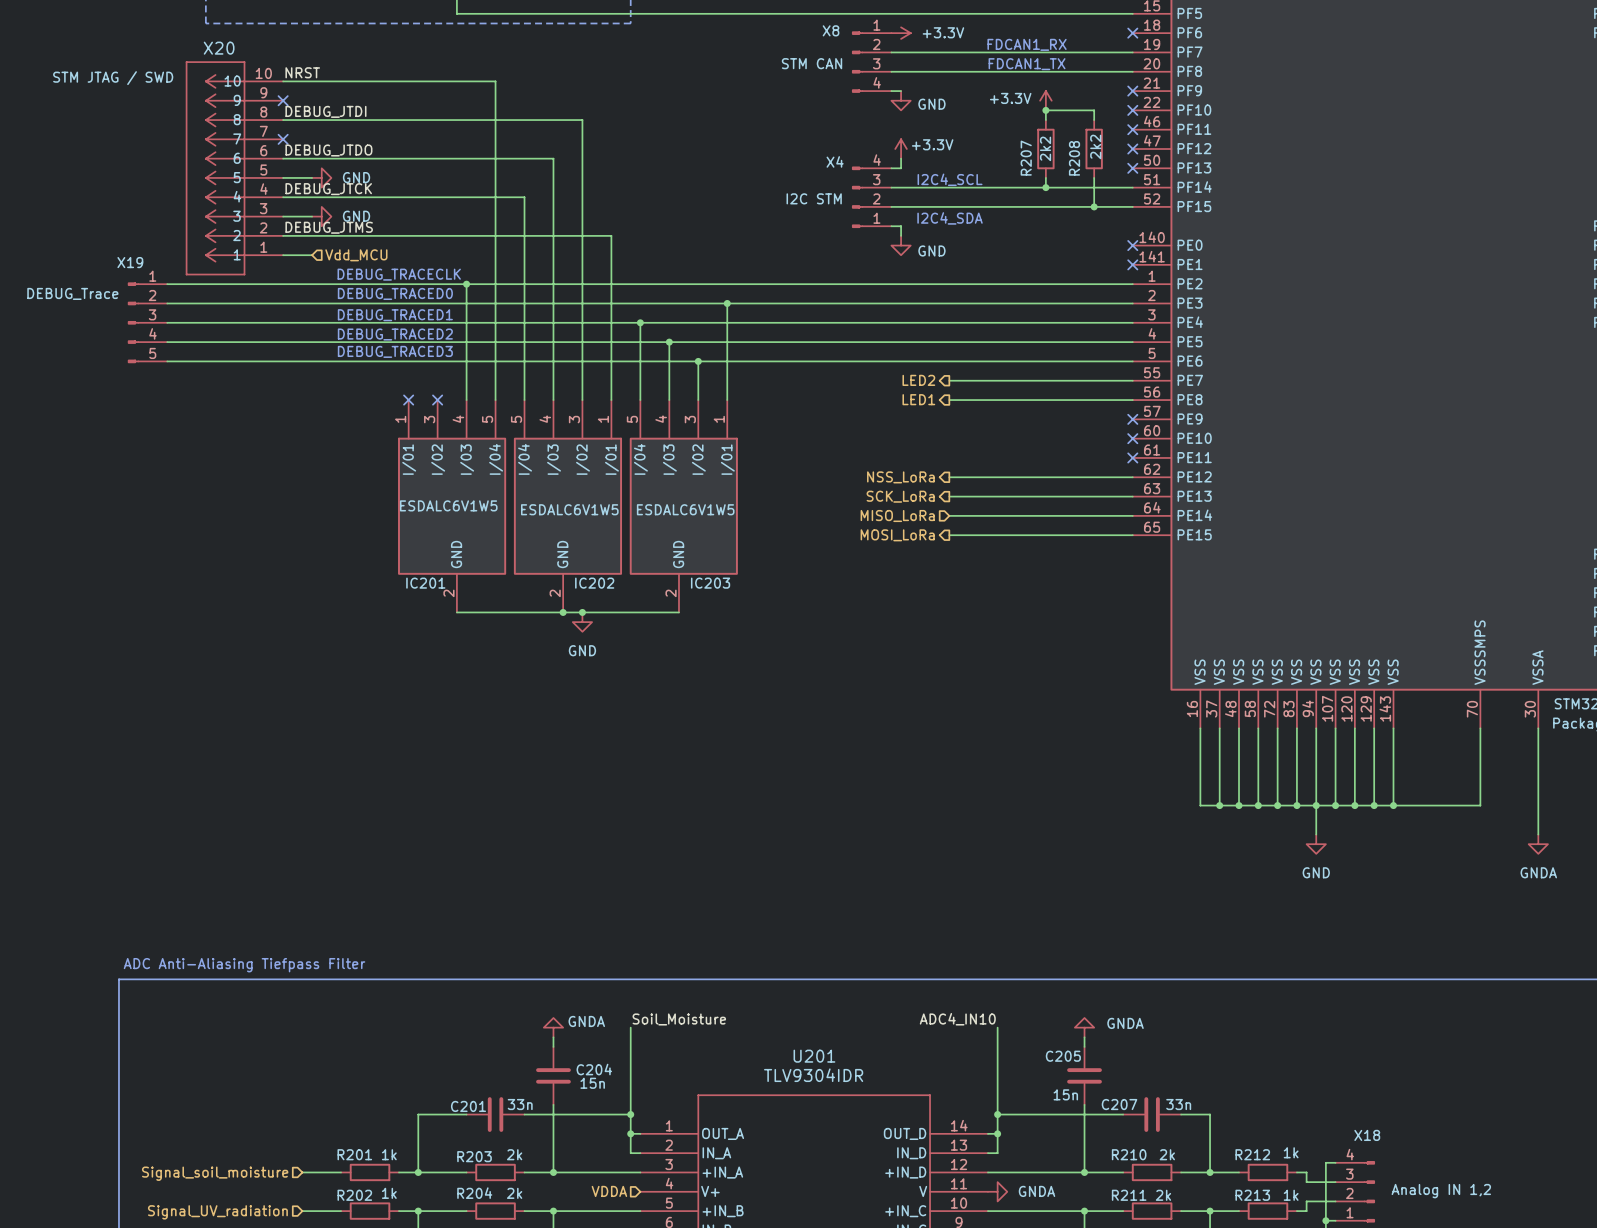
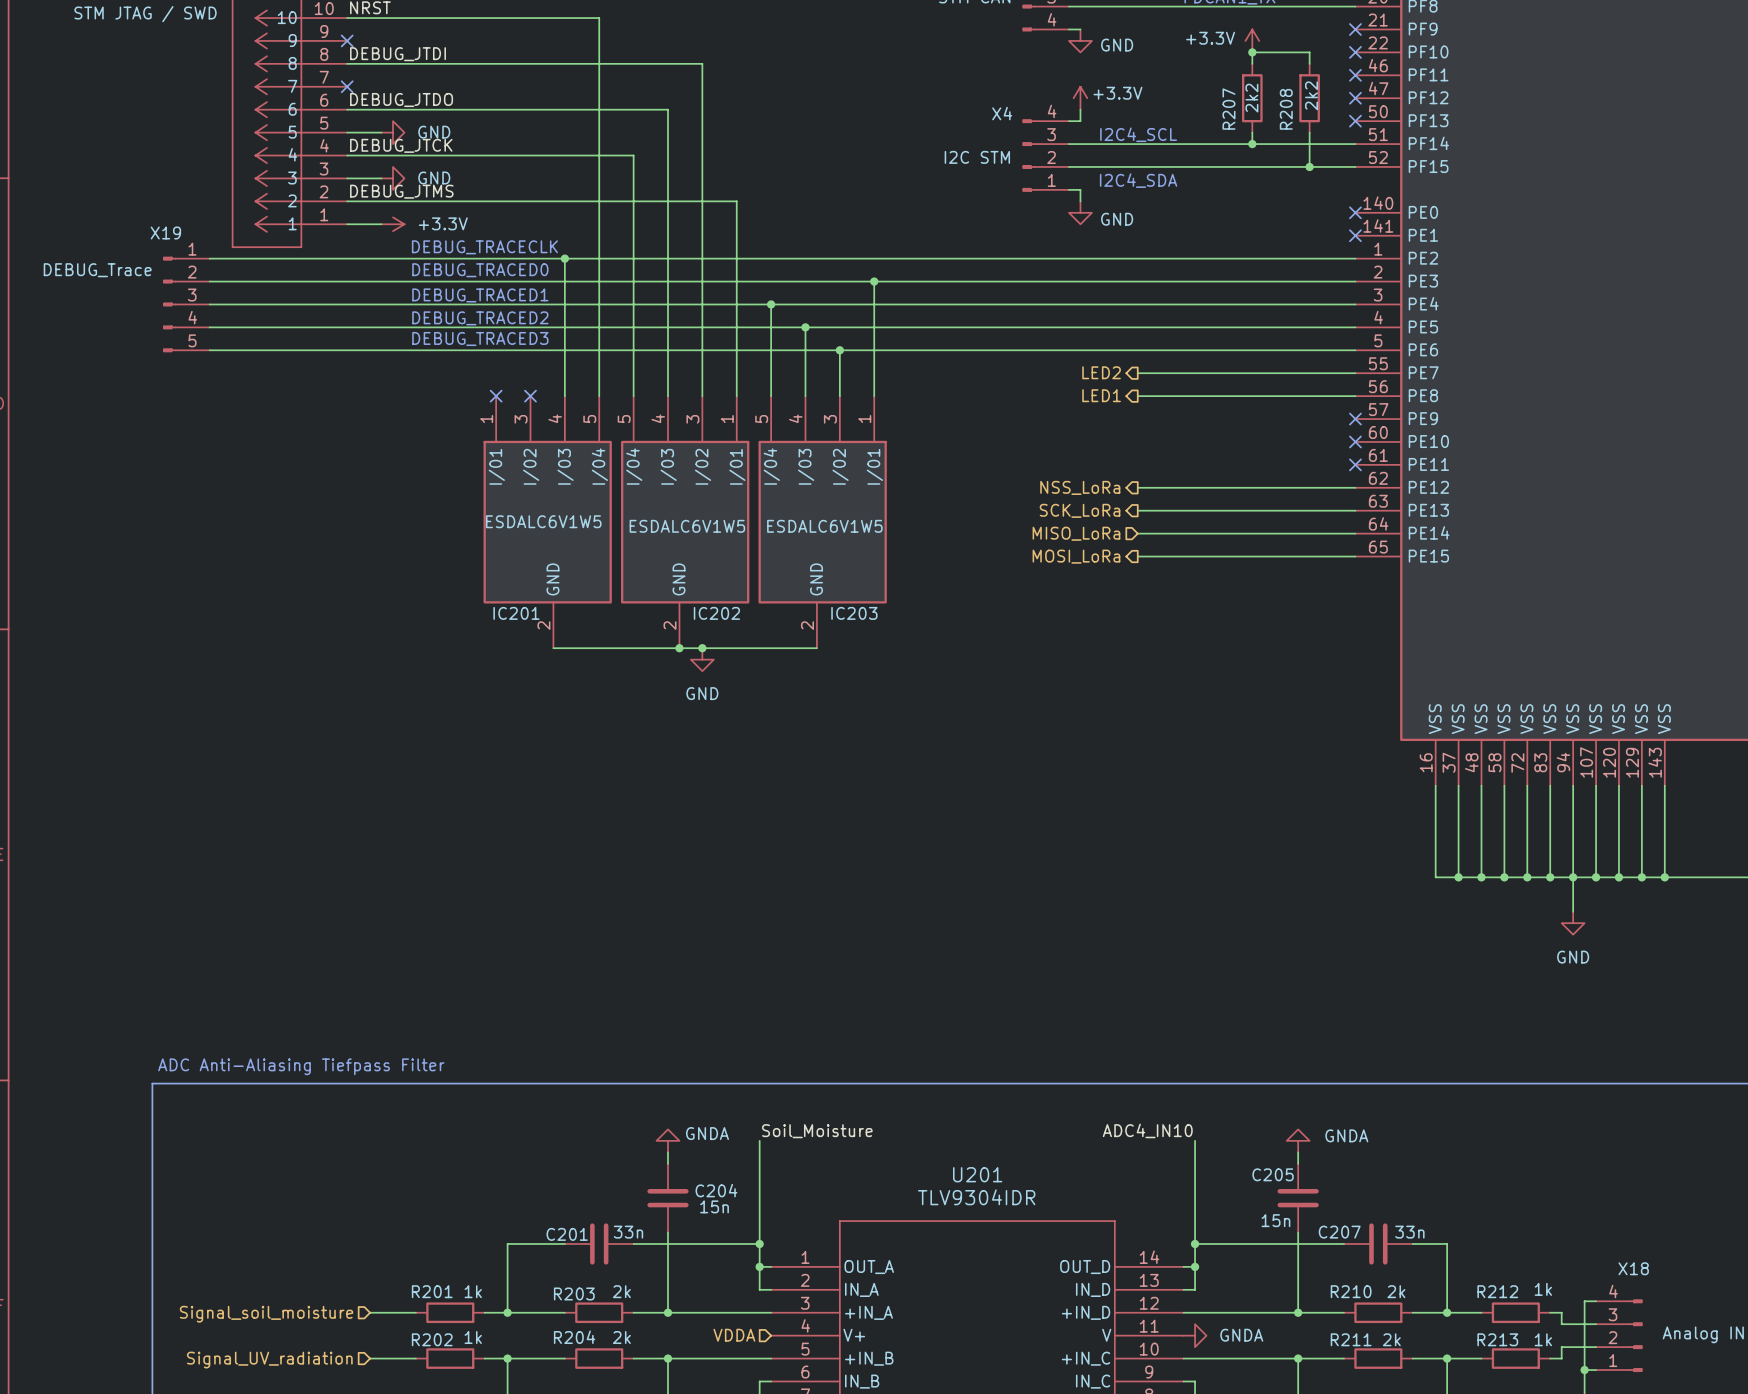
power symbol: none -> +3.3V (393, 224)
hierarchical label: Vdd_MCU (356, 255) -> none

